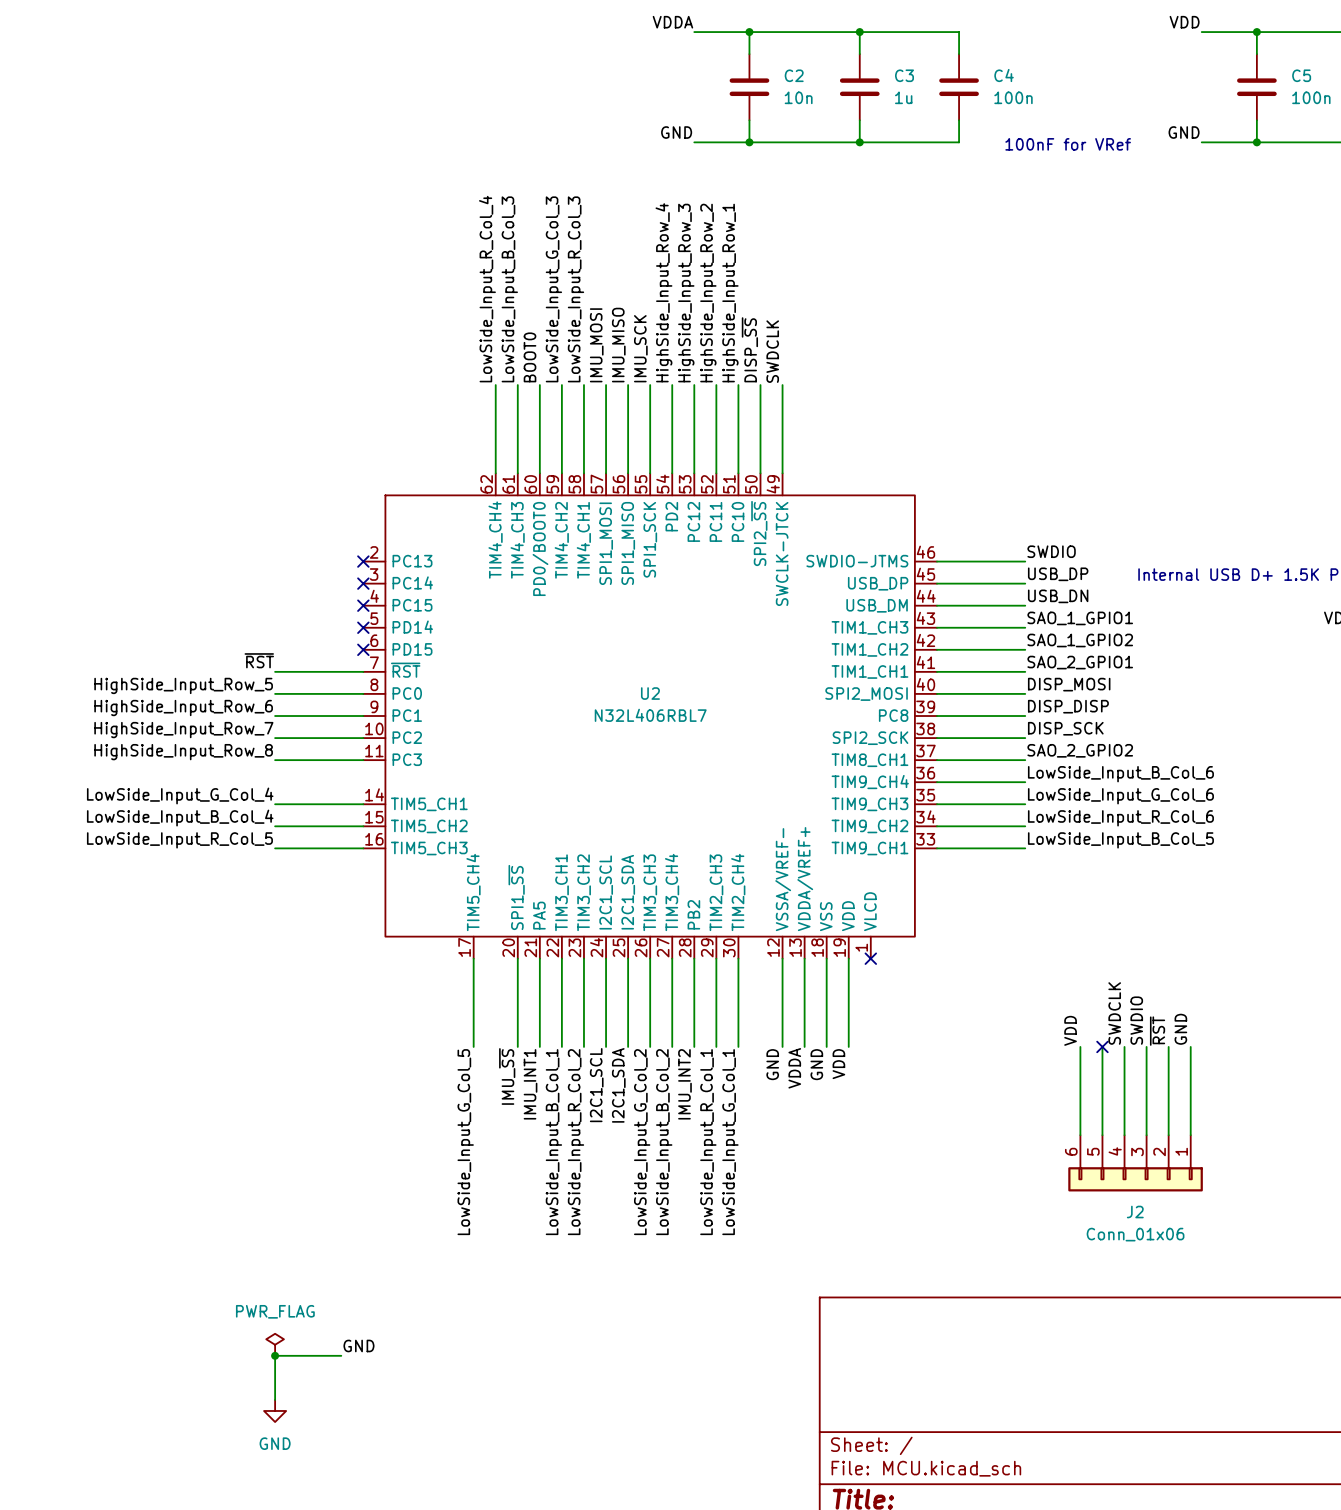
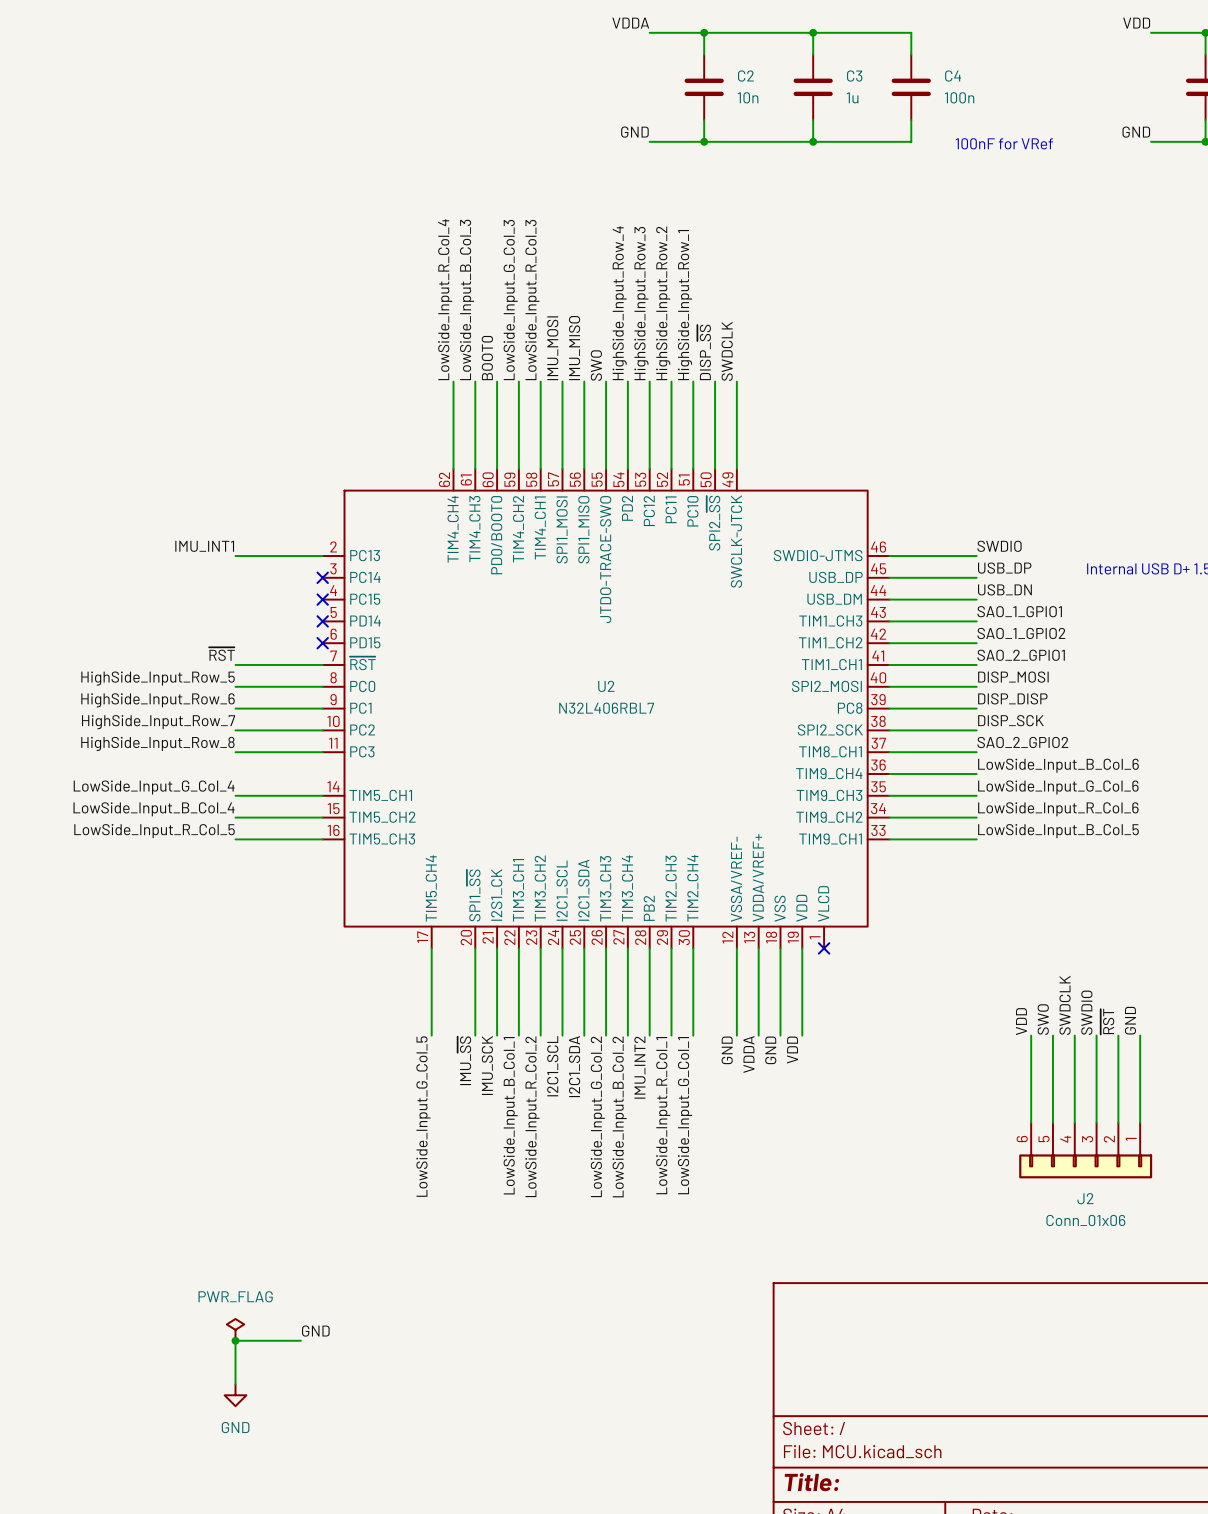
label: IMU_SCK (640, 348) -> SWO (596, 365)
U2 pin name: SPI1_SCK (650, 539) -> JTDO-TRACE-SWO (605, 559)
label: none -> IMU_INT1 (204, 546)
wire: none -> (235, 556) (322, 556)
no-connect mark: (363, 561) -> none
U2 pin name: PA5 (539, 915) -> I2S1_CK (496, 895)
label: none -> SWO (1043, 1019)
no-connect mark: (1102, 1046) -> none
label: IMU_INT1 (530, 1084) -> IMU_SCK (487, 1065)

